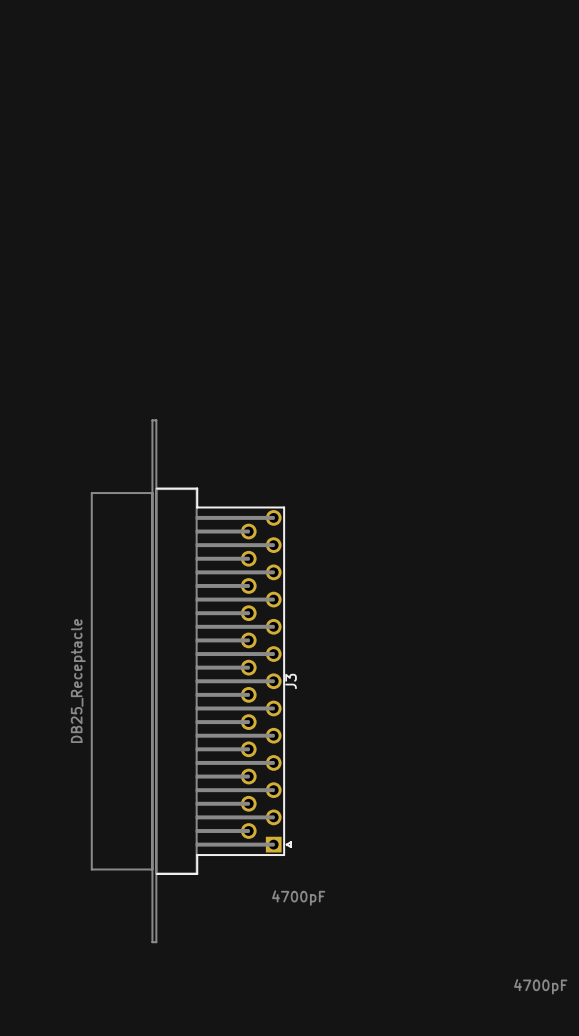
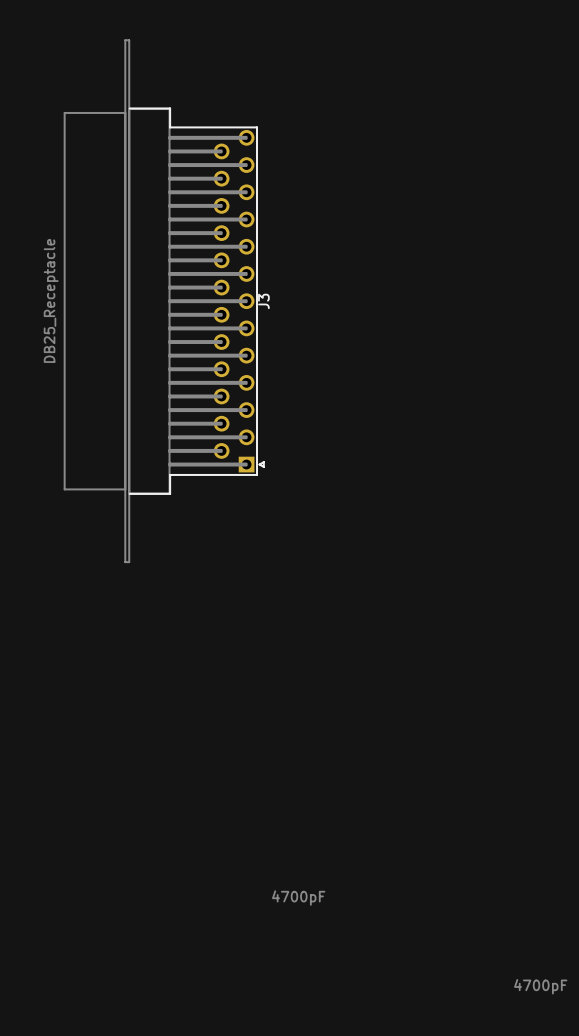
J3 position: (191, 681) -> (164, 301)

